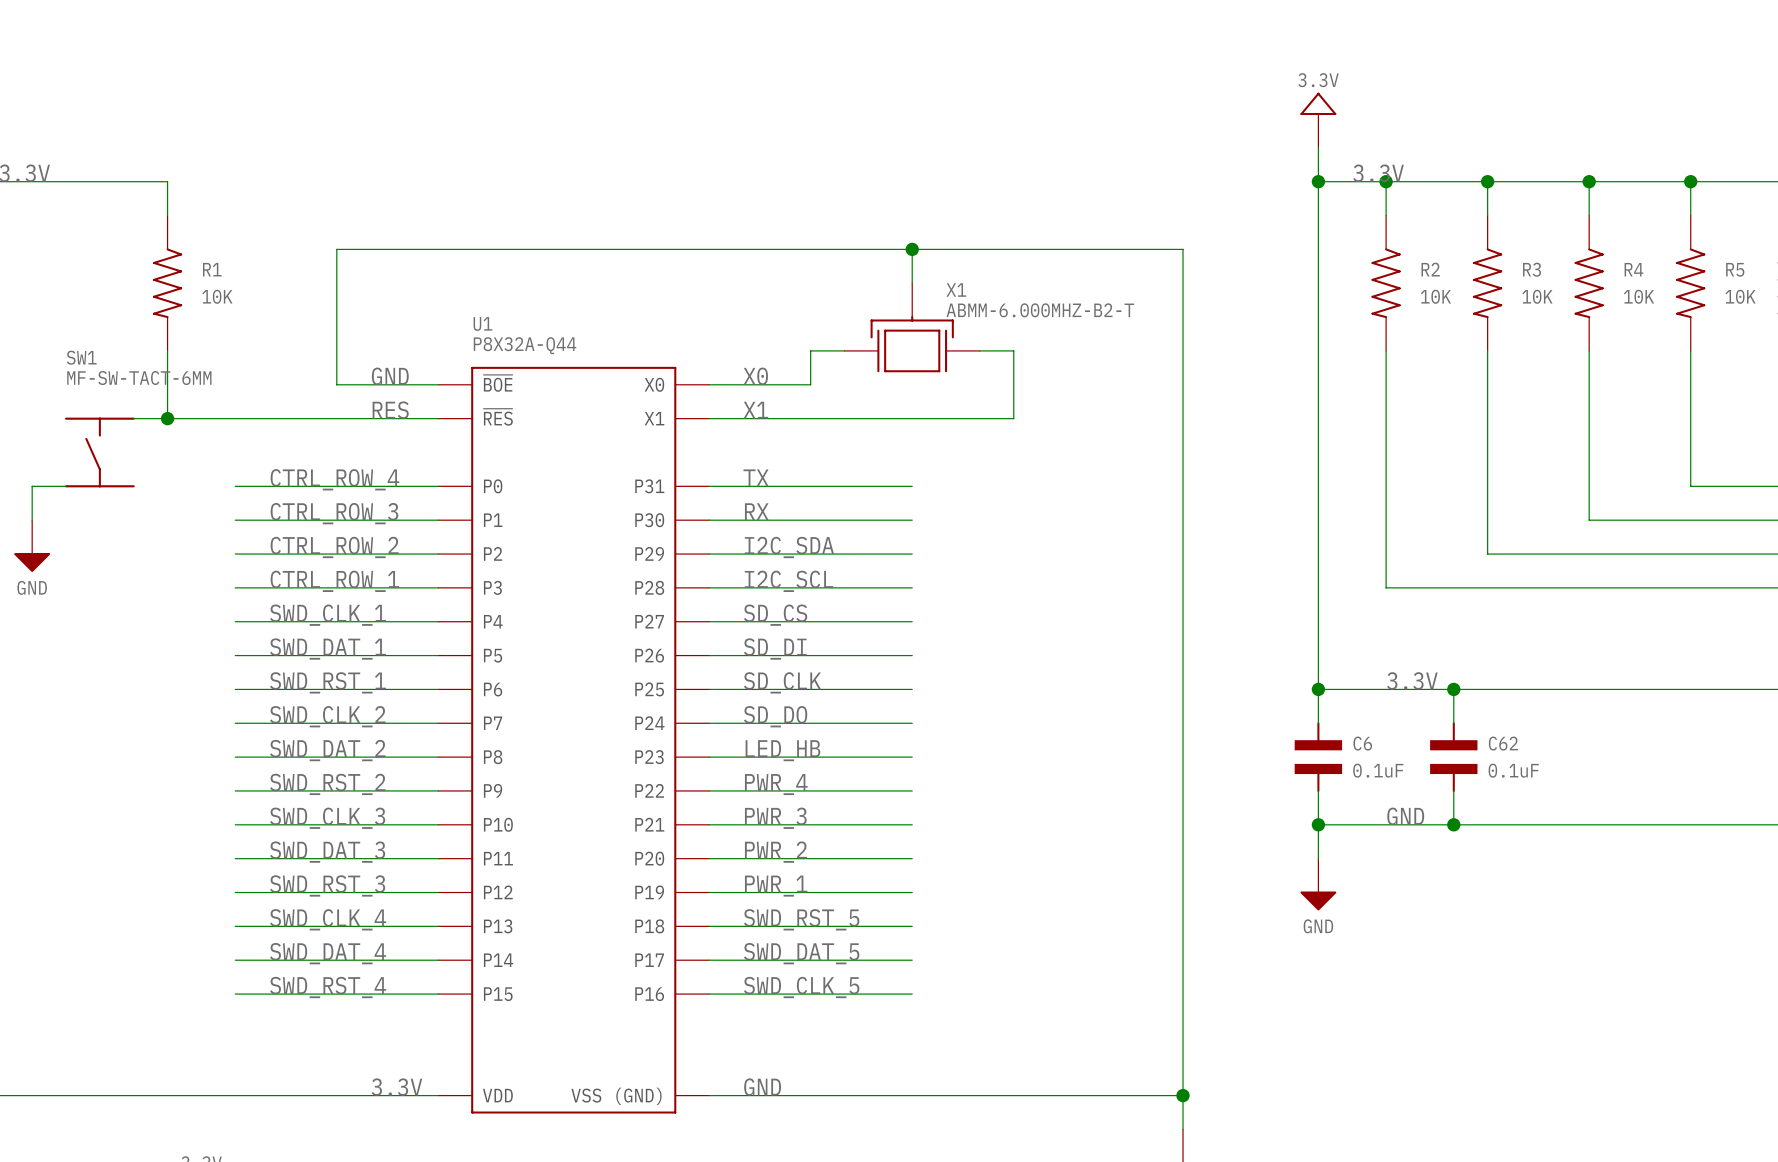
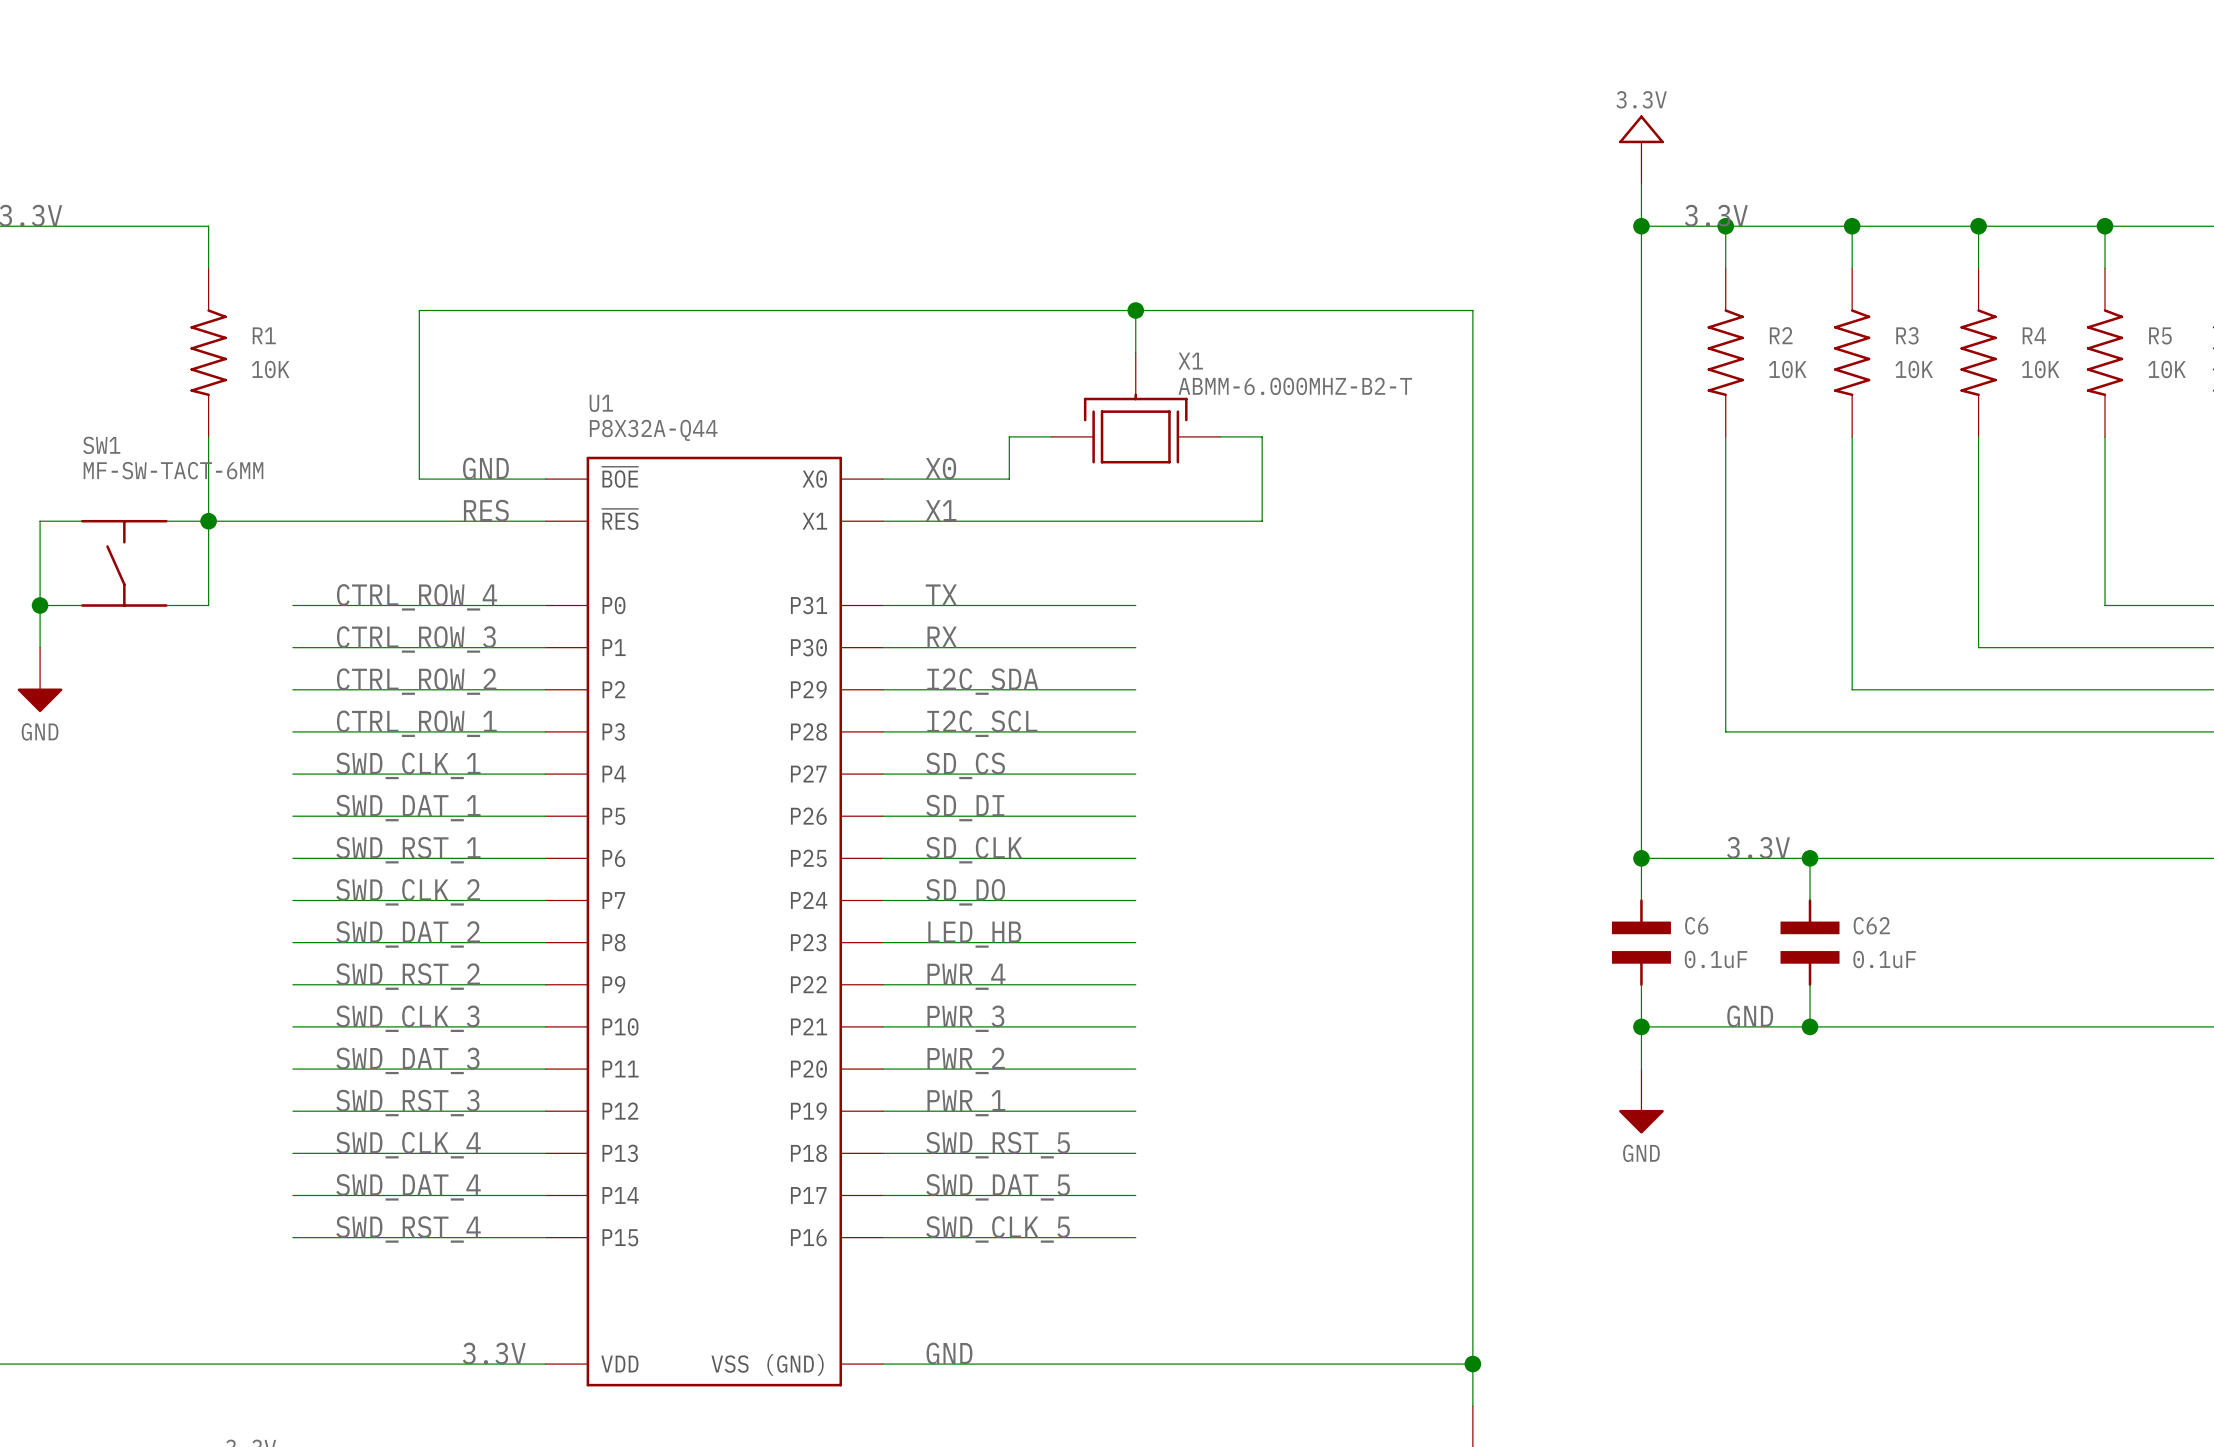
wire: none -> (82, 521) (40, 521) (40, 605)
wire: none -> (208, 521) (208, 605) (166, 605)
junction: none -> (40, 605)

